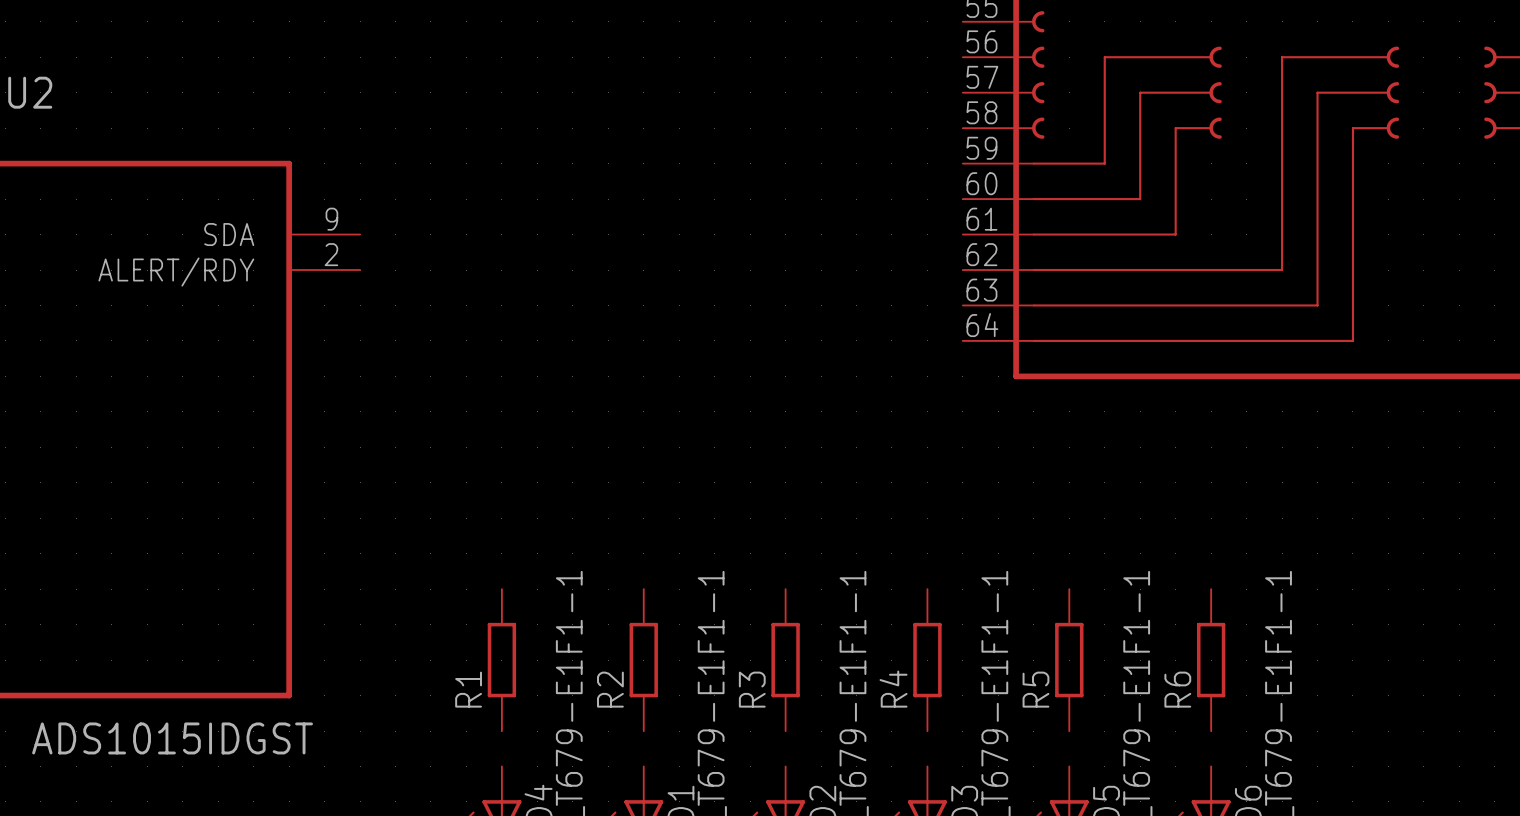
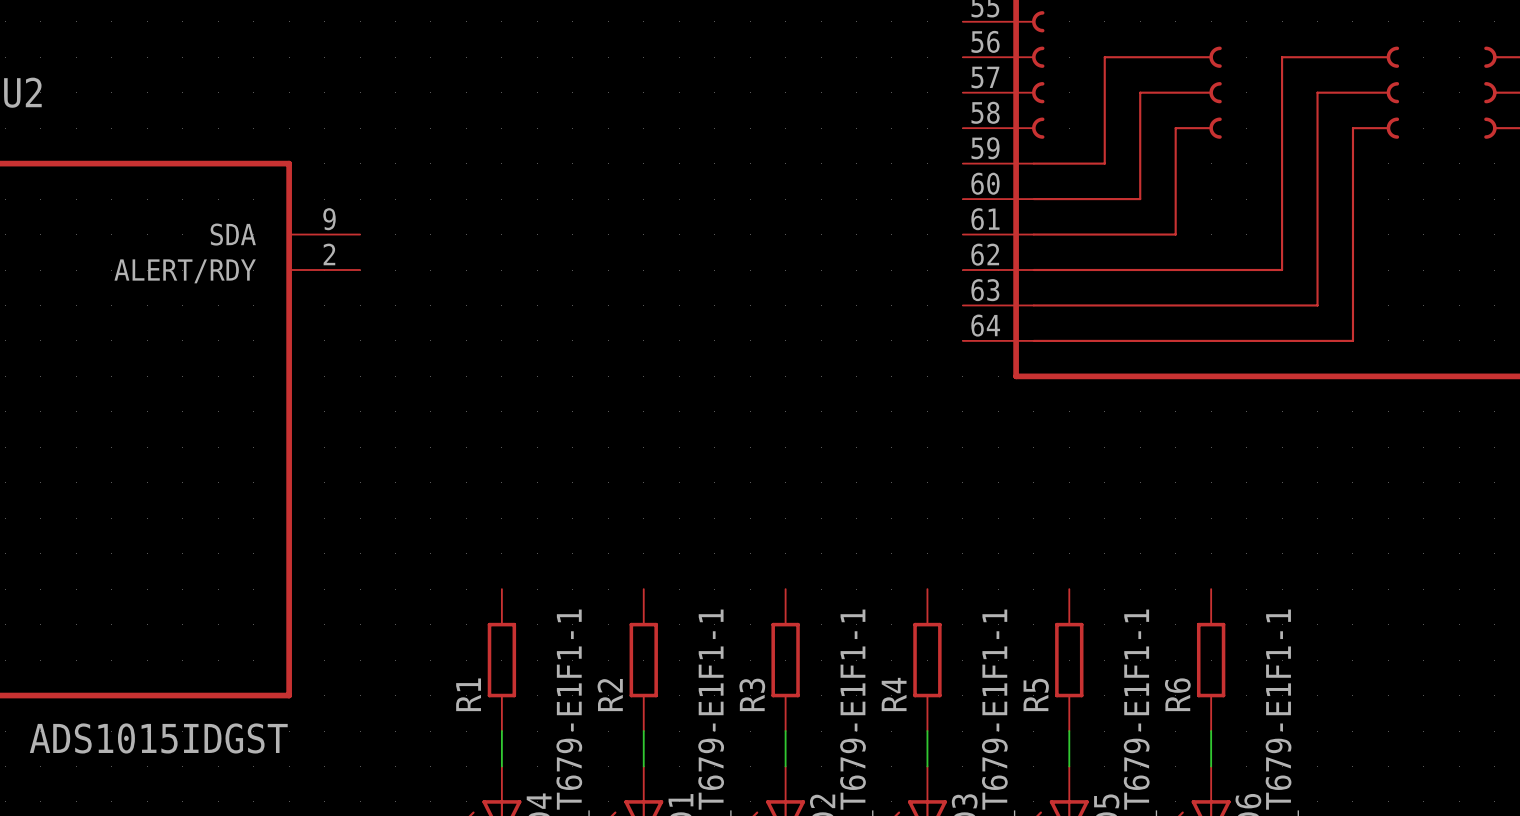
wire: none -> (501, 731) (501, 766)
wire: none -> (643, 731) (643, 766)
wire: none -> (785, 731) (785, 766)
wire: none -> (927, 731) (927, 766)
wire: none -> (1069, 731) (1069, 766)
wire: none -> (1211, 731) (1211, 766)

